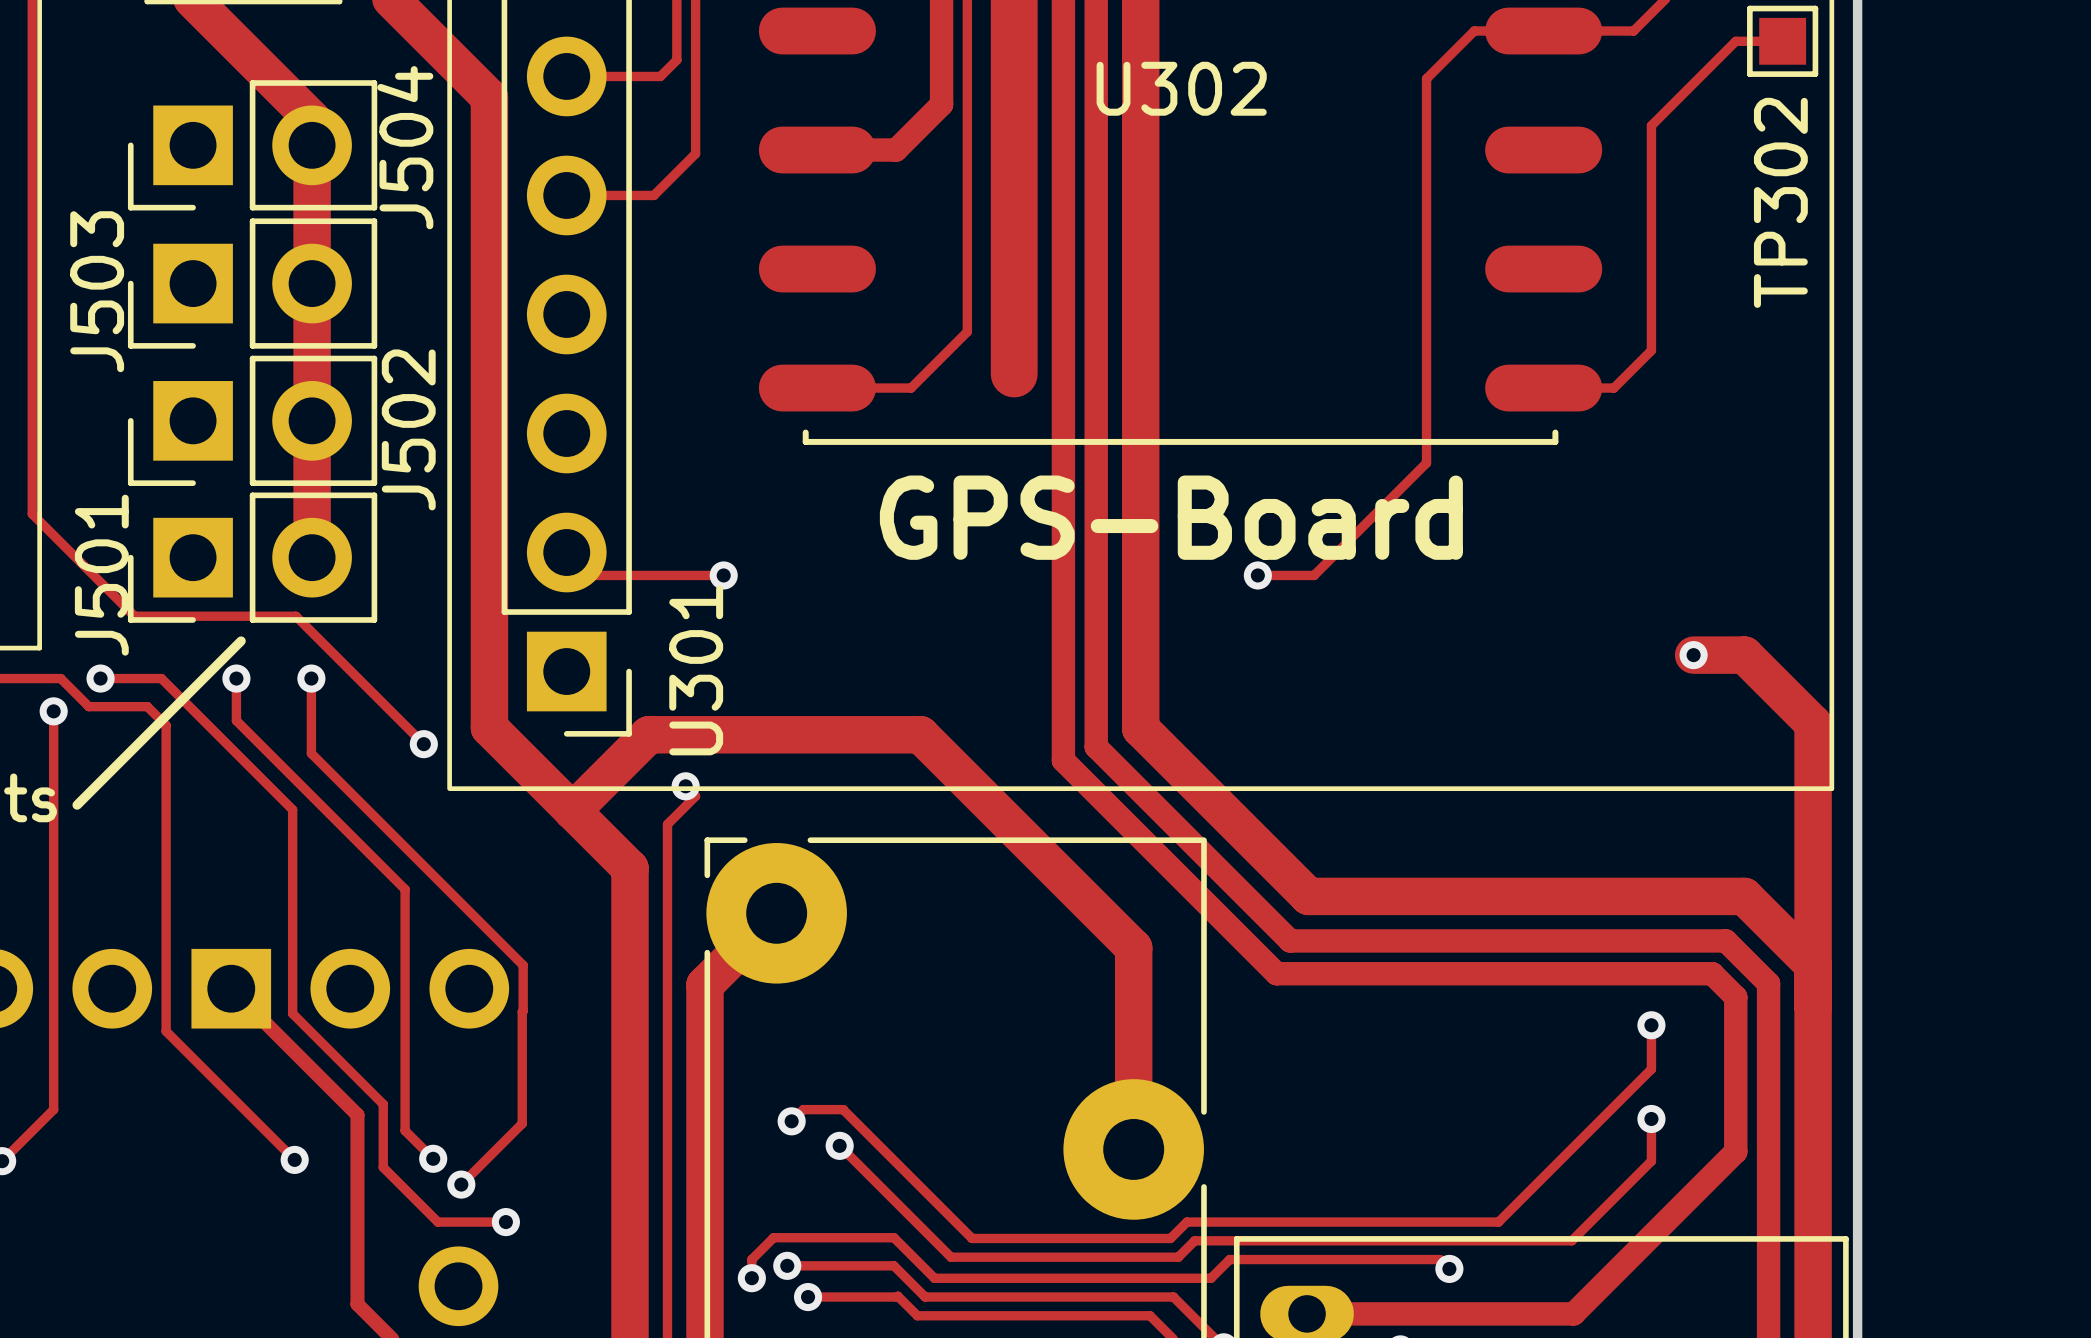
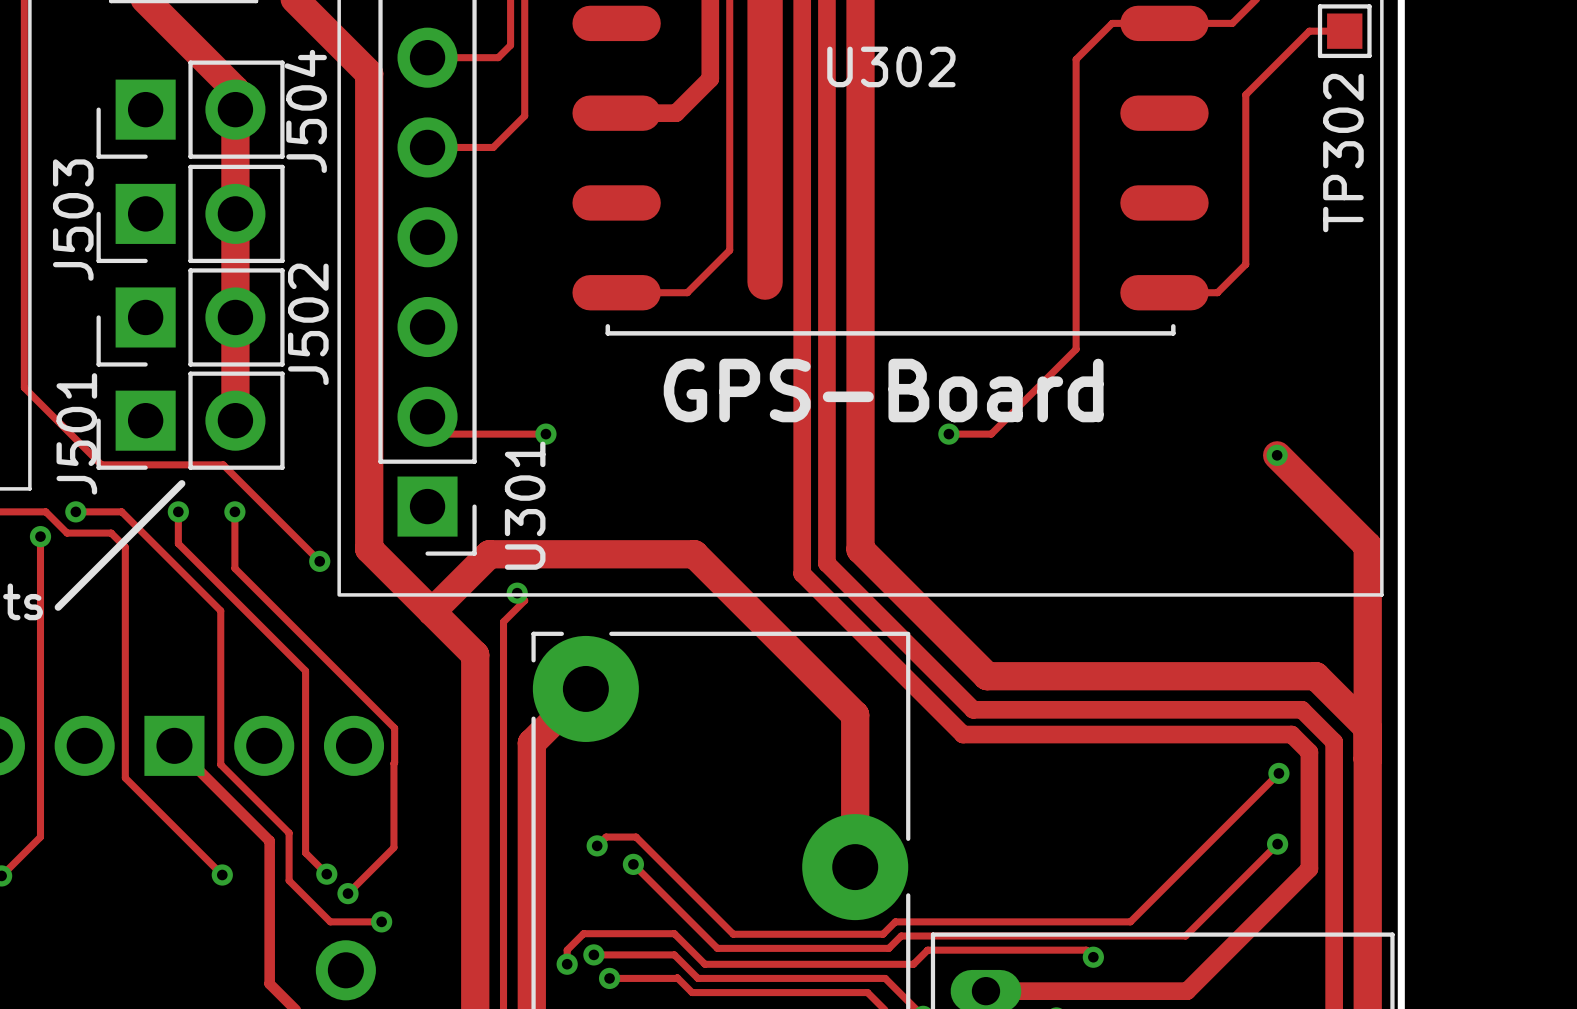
track: (1693, 655) (1744, 655) -> (1277, 455) (1316, 494)
via position: (1693, 655) -> (1277, 455)
track: (1651, 1025) (1651, 1069) -> (1278, 773) (1245, 806)
via position: (1651, 1025) -> (1278, 773)
track: (1651, 1118) (1651, 1161) -> (1277, 844) (1245, 875)
via position: (1651, 1118) -> (1277, 844)

